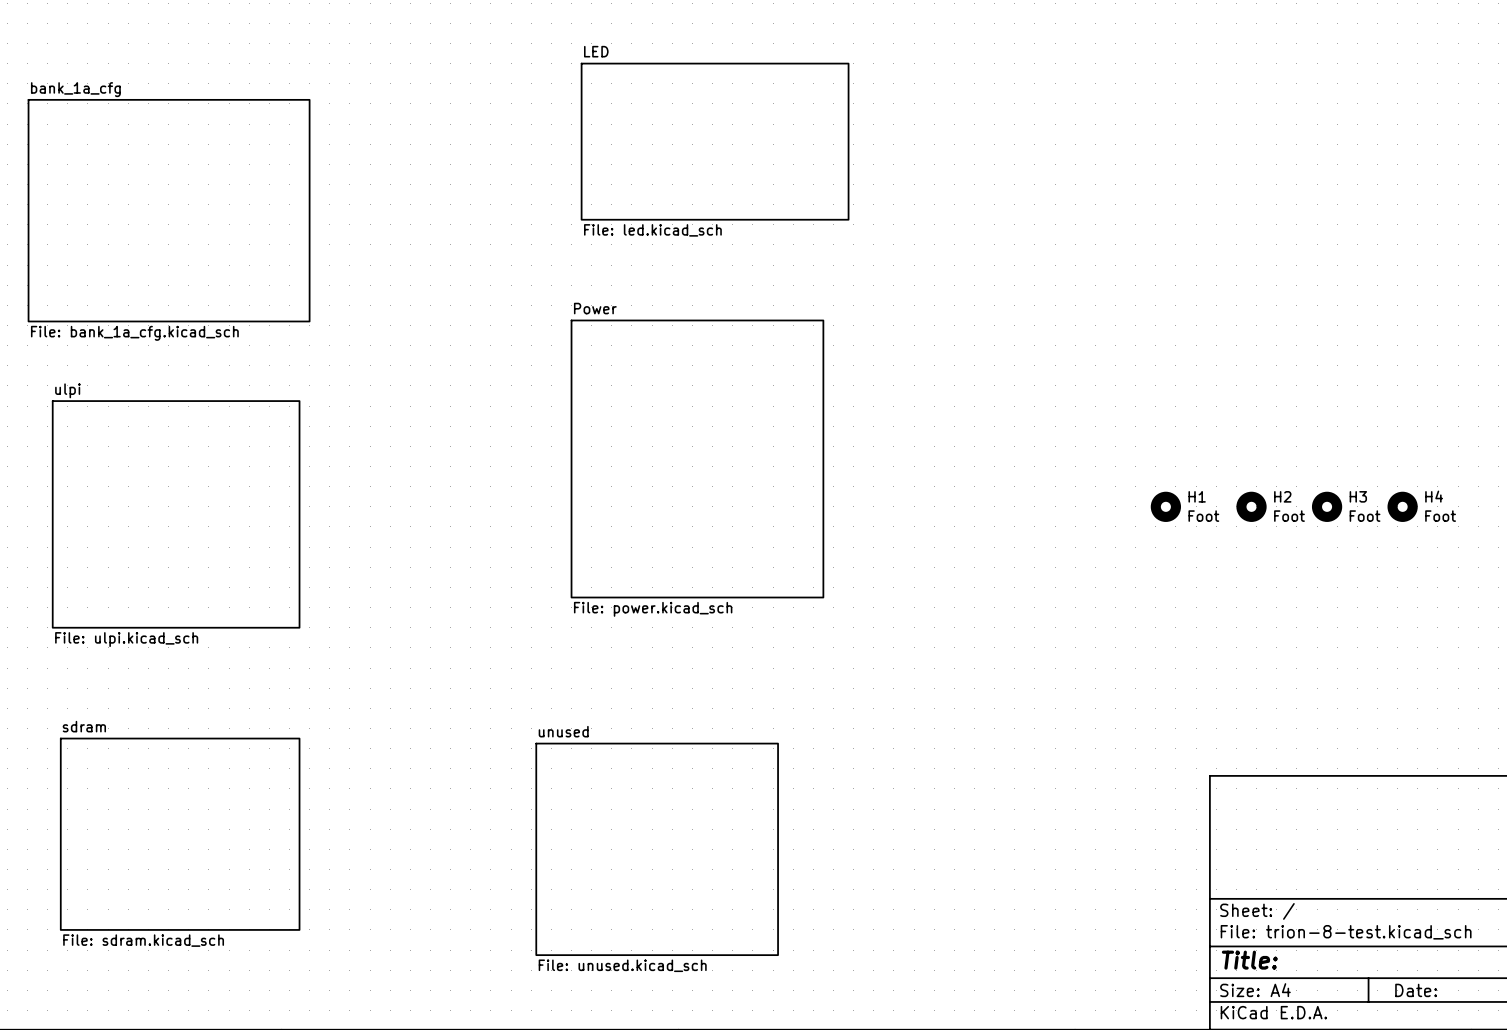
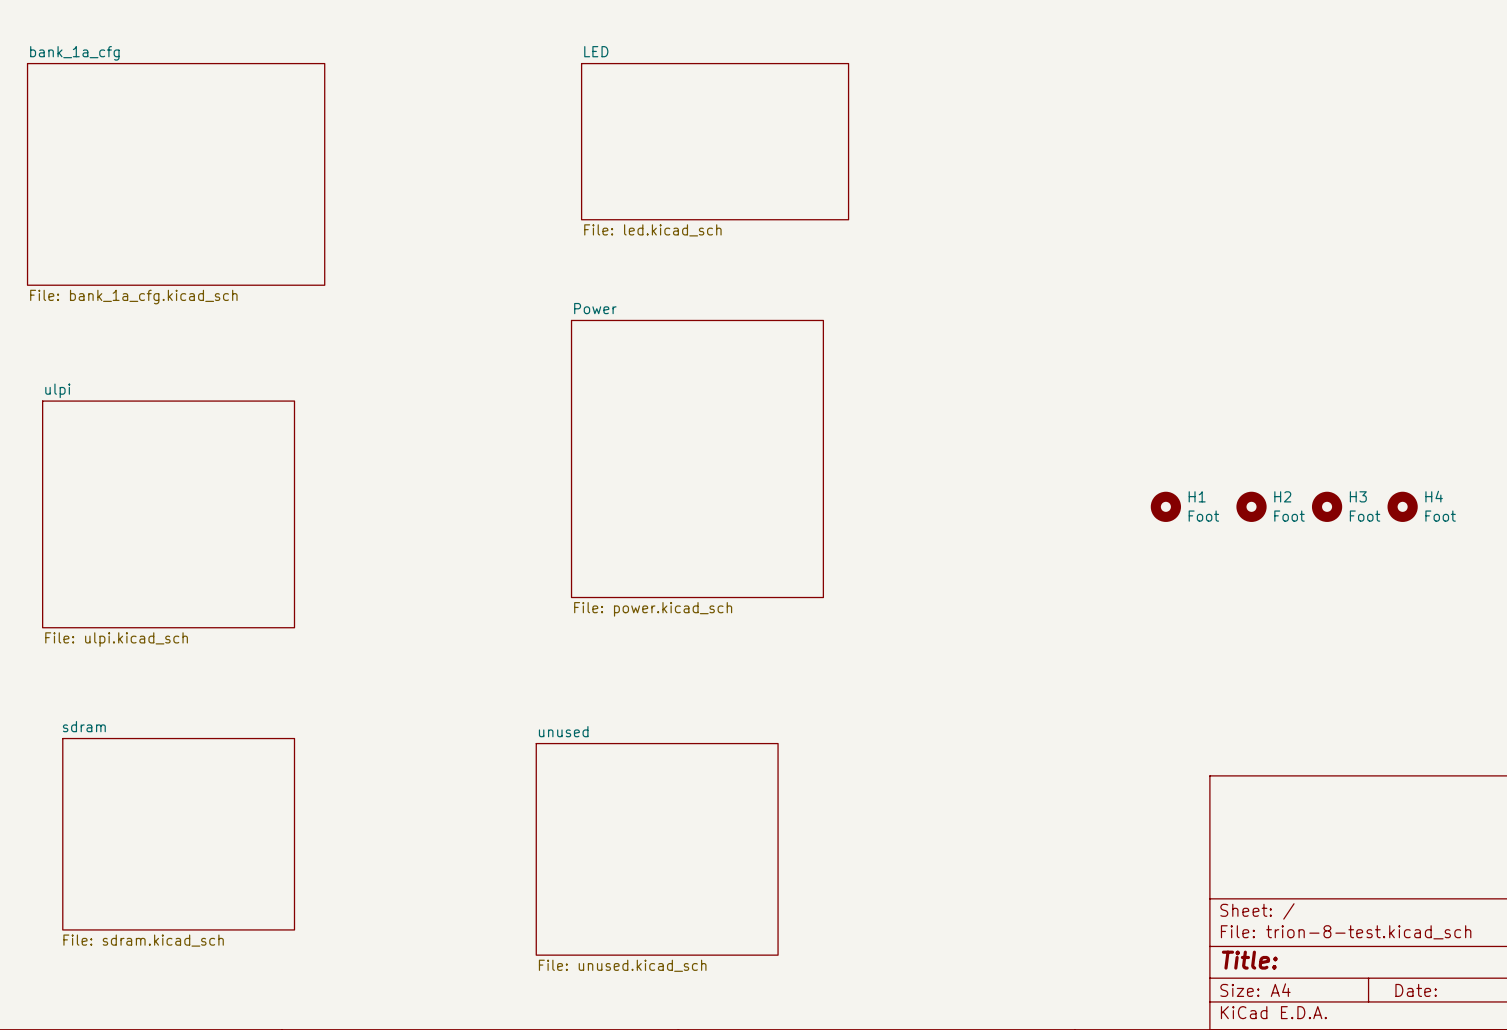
sheet bank_1a_cfg shape: [27, 99, 311, 323] -> [26, 62, 326, 286]
sheet ulpi shape: [52, 400, 301, 629] -> [42, 400, 296, 629]
sheet sdram shape: [60, 737, 301, 931] -> [62, 737, 296, 931]

